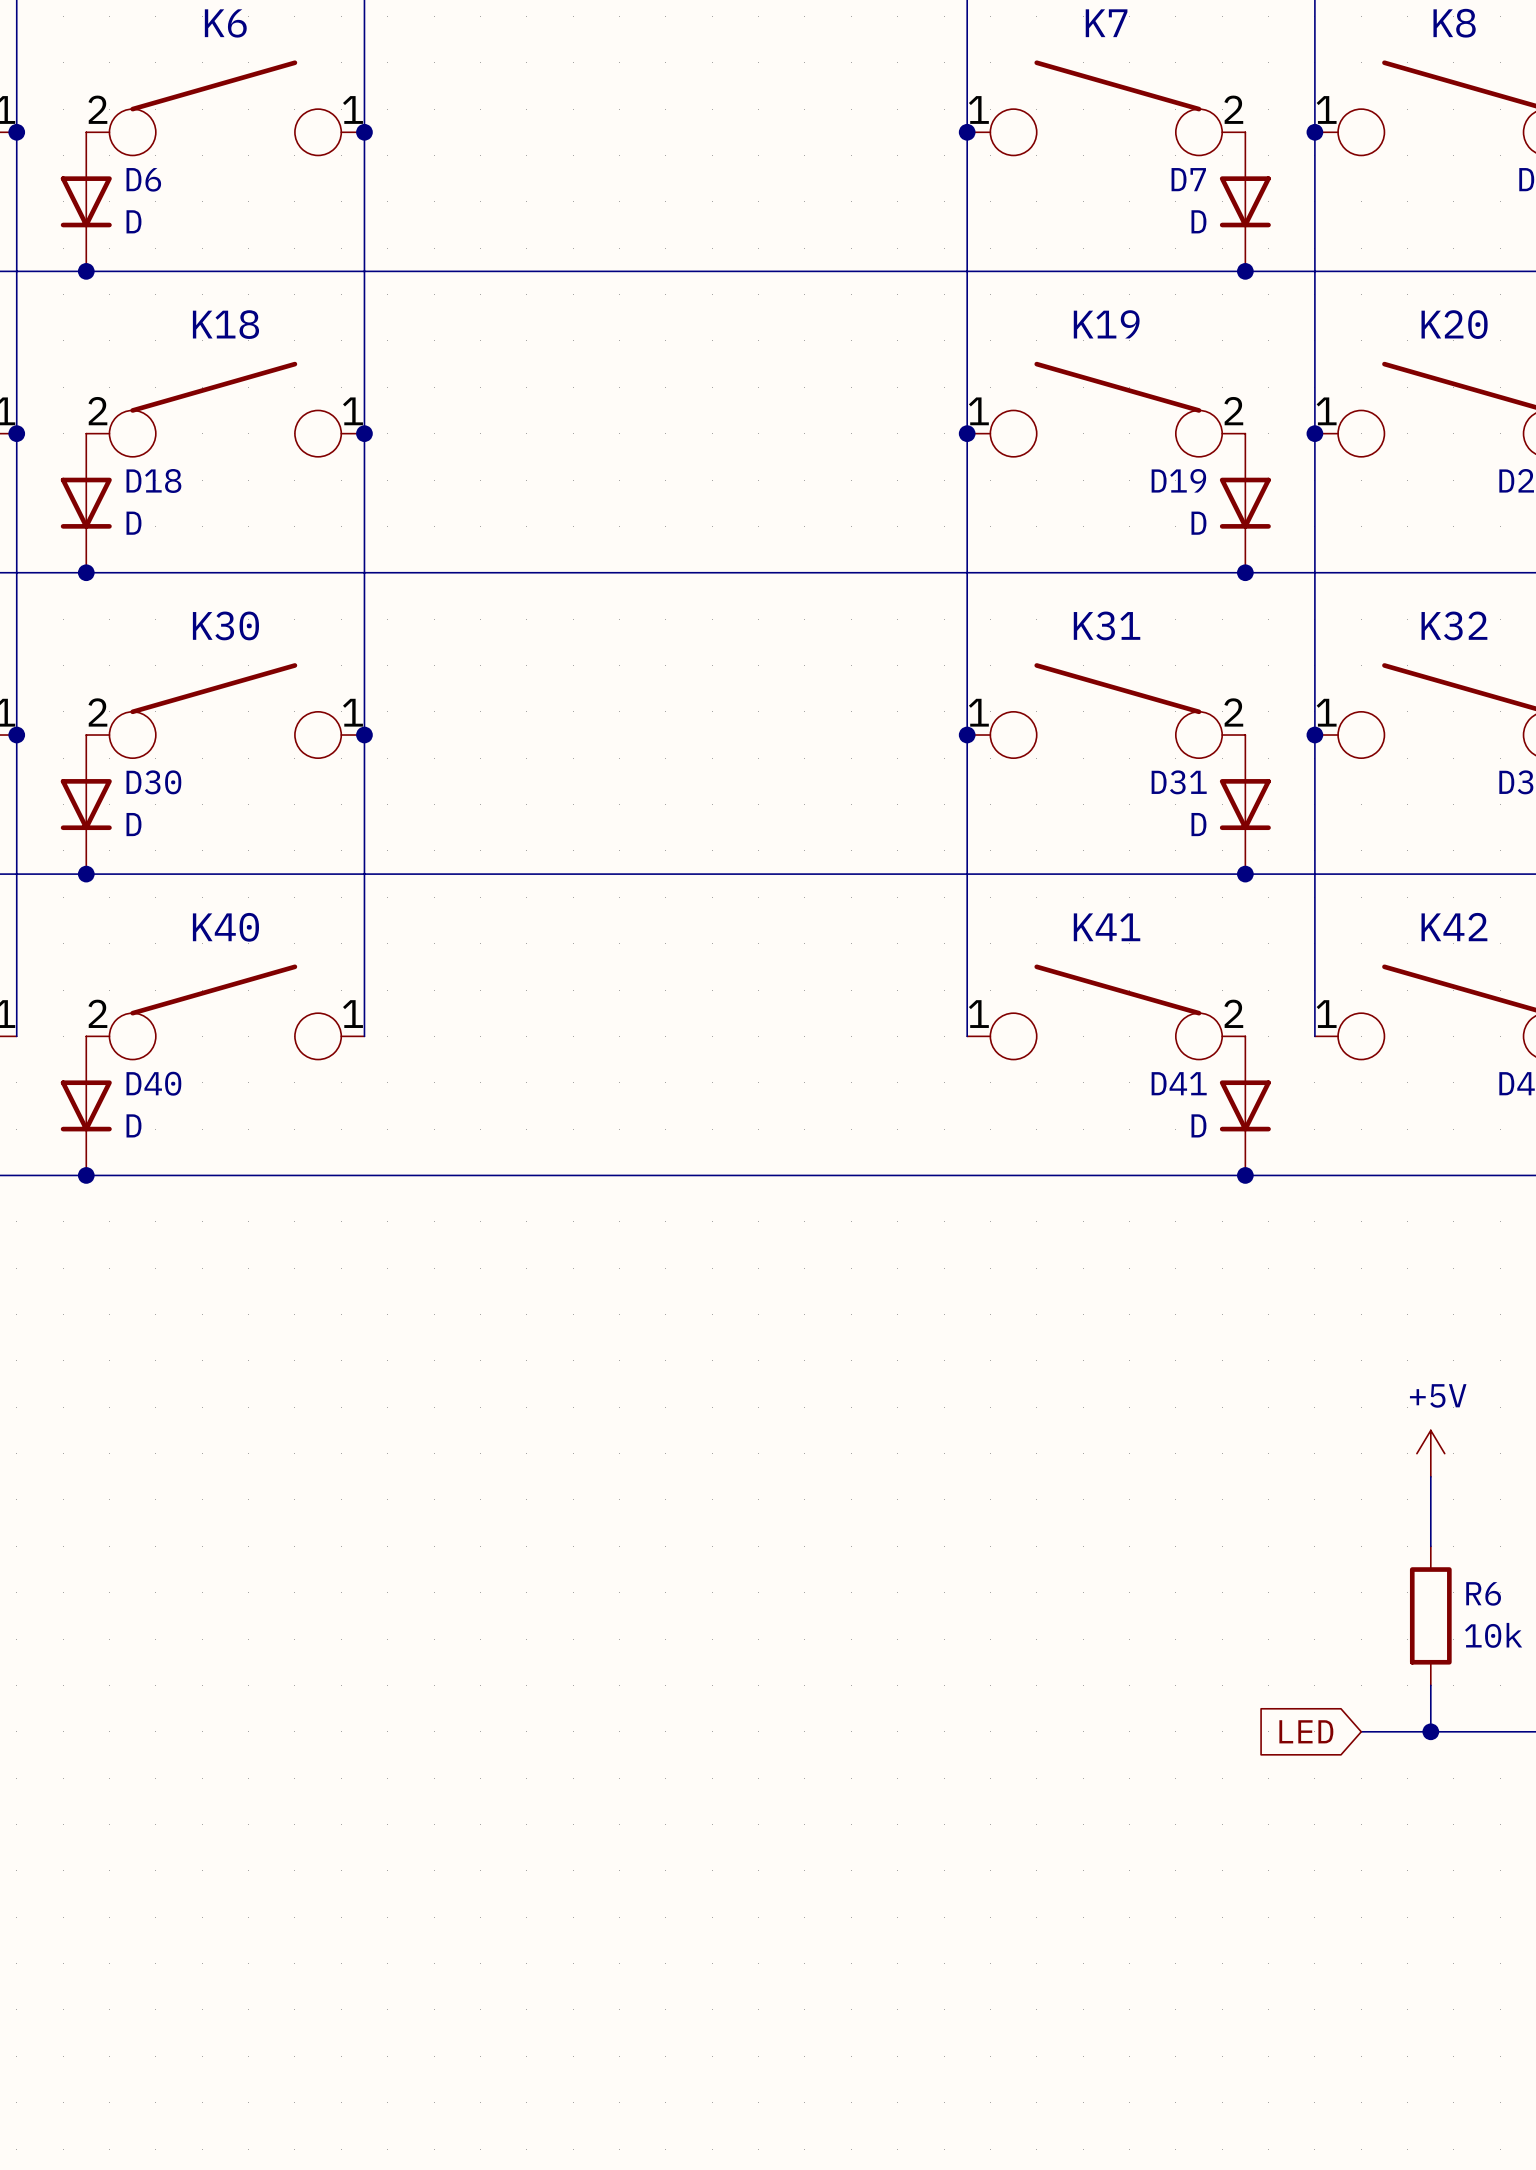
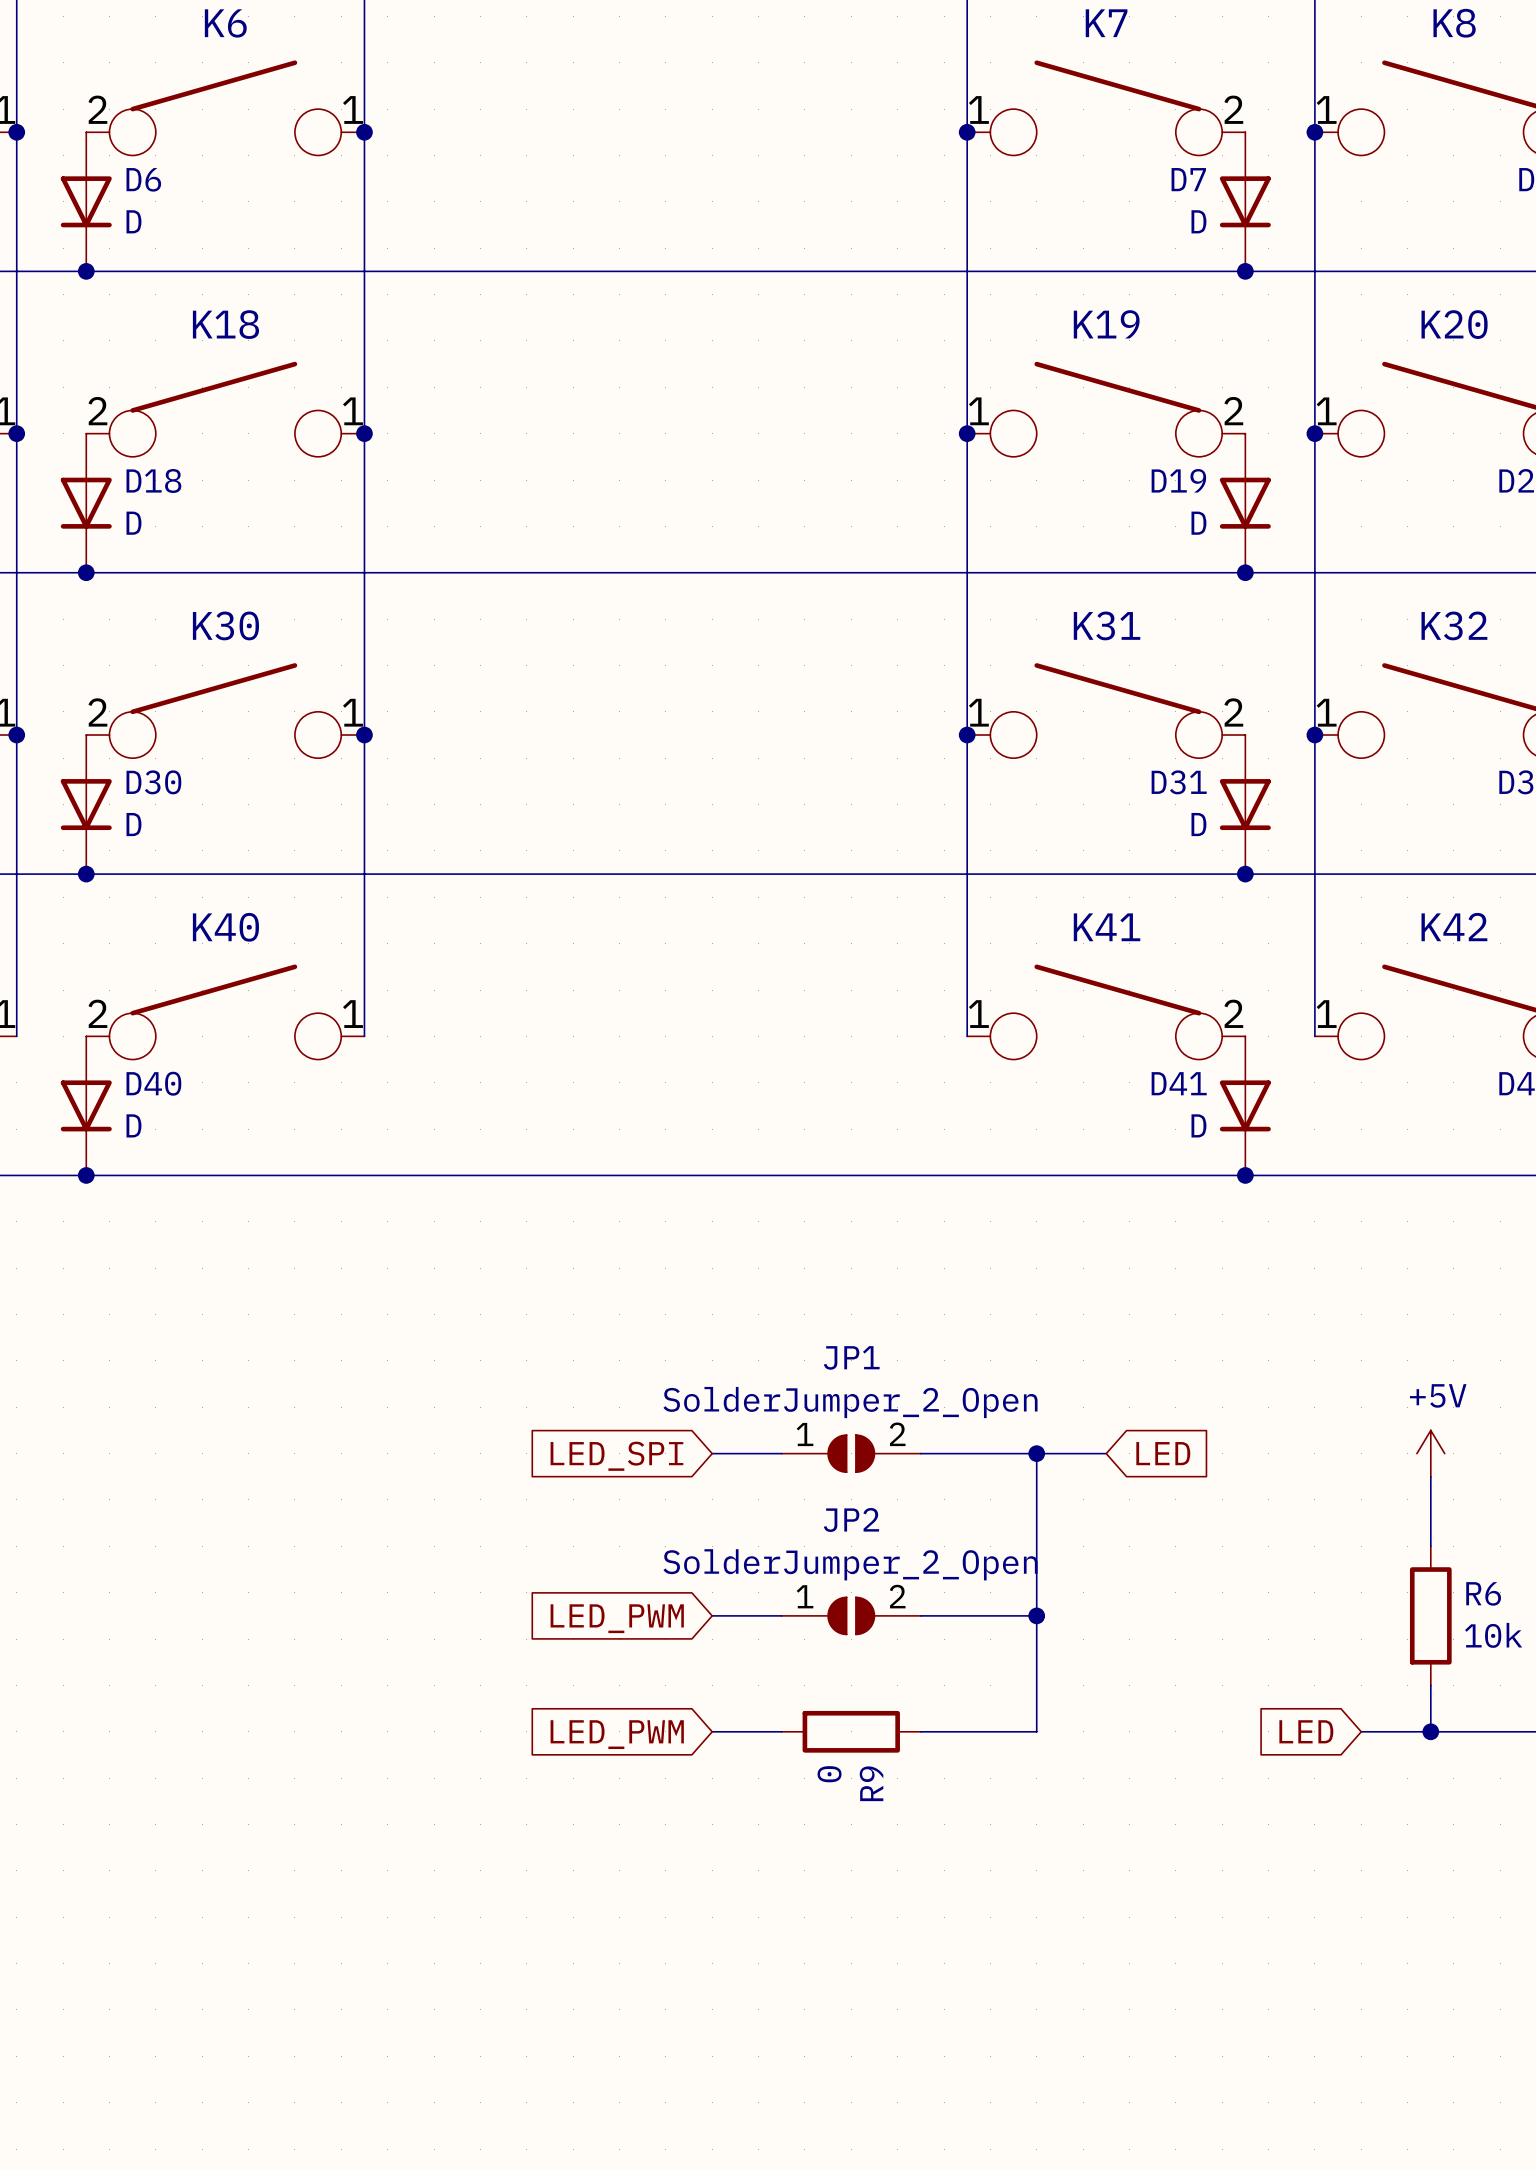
wire: none -> (712, 1453) (781, 1453)
JP1: none -> SolderJumper_2_Open (851, 1453)
wire: none -> (920, 1453) (1106, 1453)
wire: none -> (1036, 1453) (1036, 1731) (920, 1731)
junction: none -> (1036, 1453)
global label: none -> LED (1163, 1453)
global label: none -> LED_SPI (616, 1456)
wire: none -> (712, 1615) (781, 1615)
JP2: none -> SolderJumper_2_Open (851, 1615)
wire: none -> (920, 1615) (1036, 1615)
junction: none -> (1036, 1615)
global label: none -> LED_PWM (617, 1618)
wire: none -> (712, 1731) (781, 1731)
R9: none -> 0 (851, 1731)
global label: none -> LED_PWM (617, 1734)

